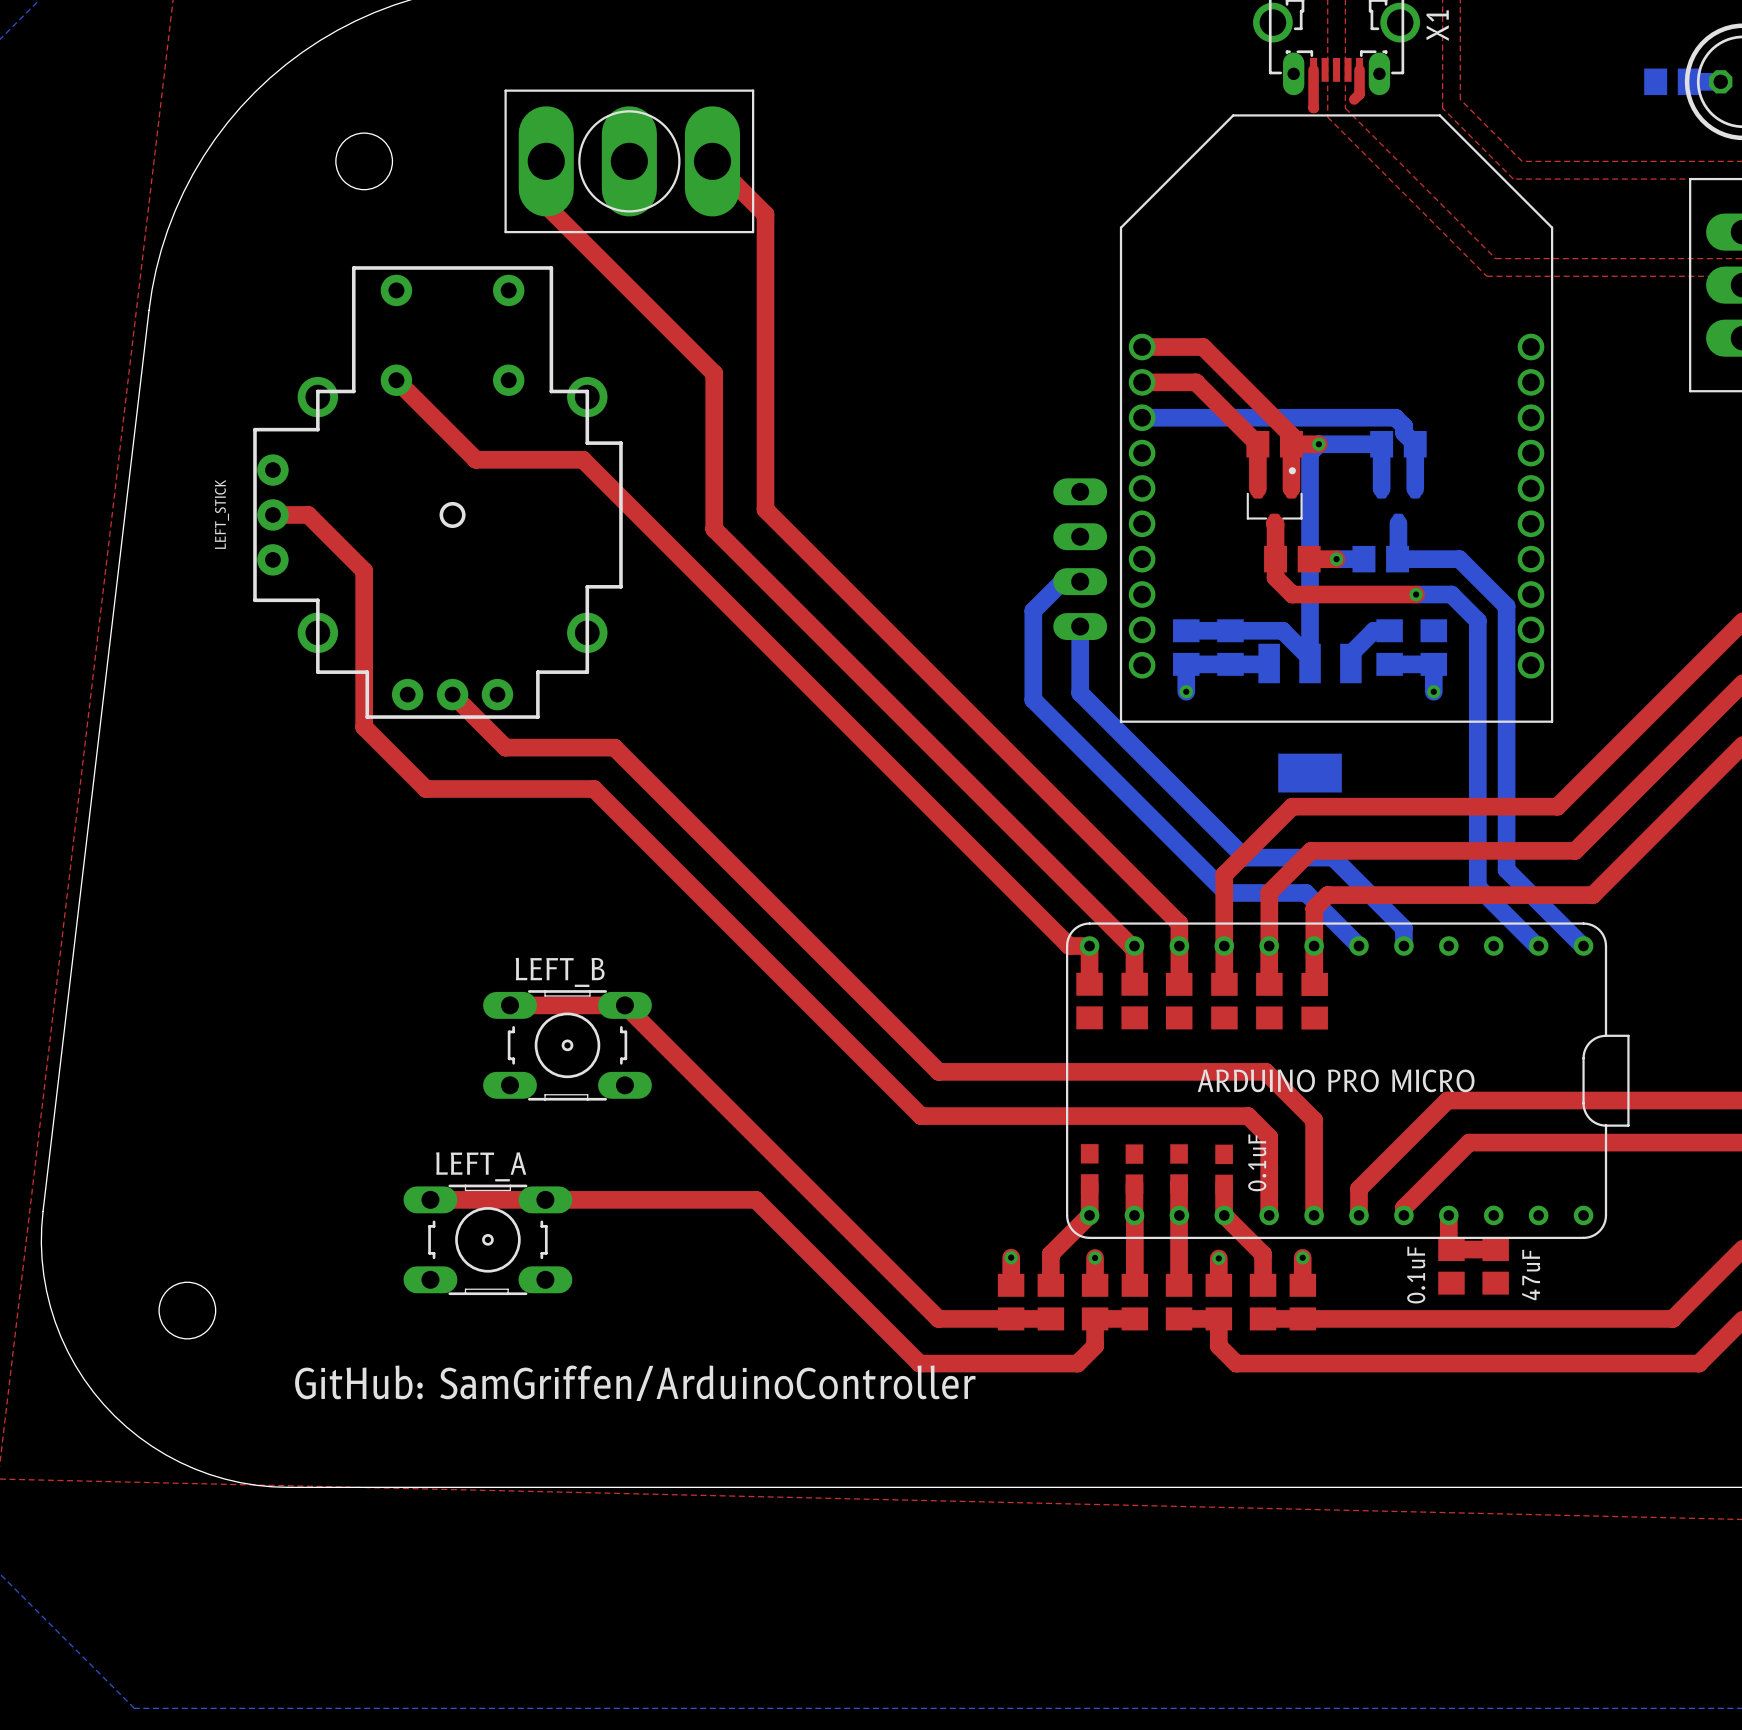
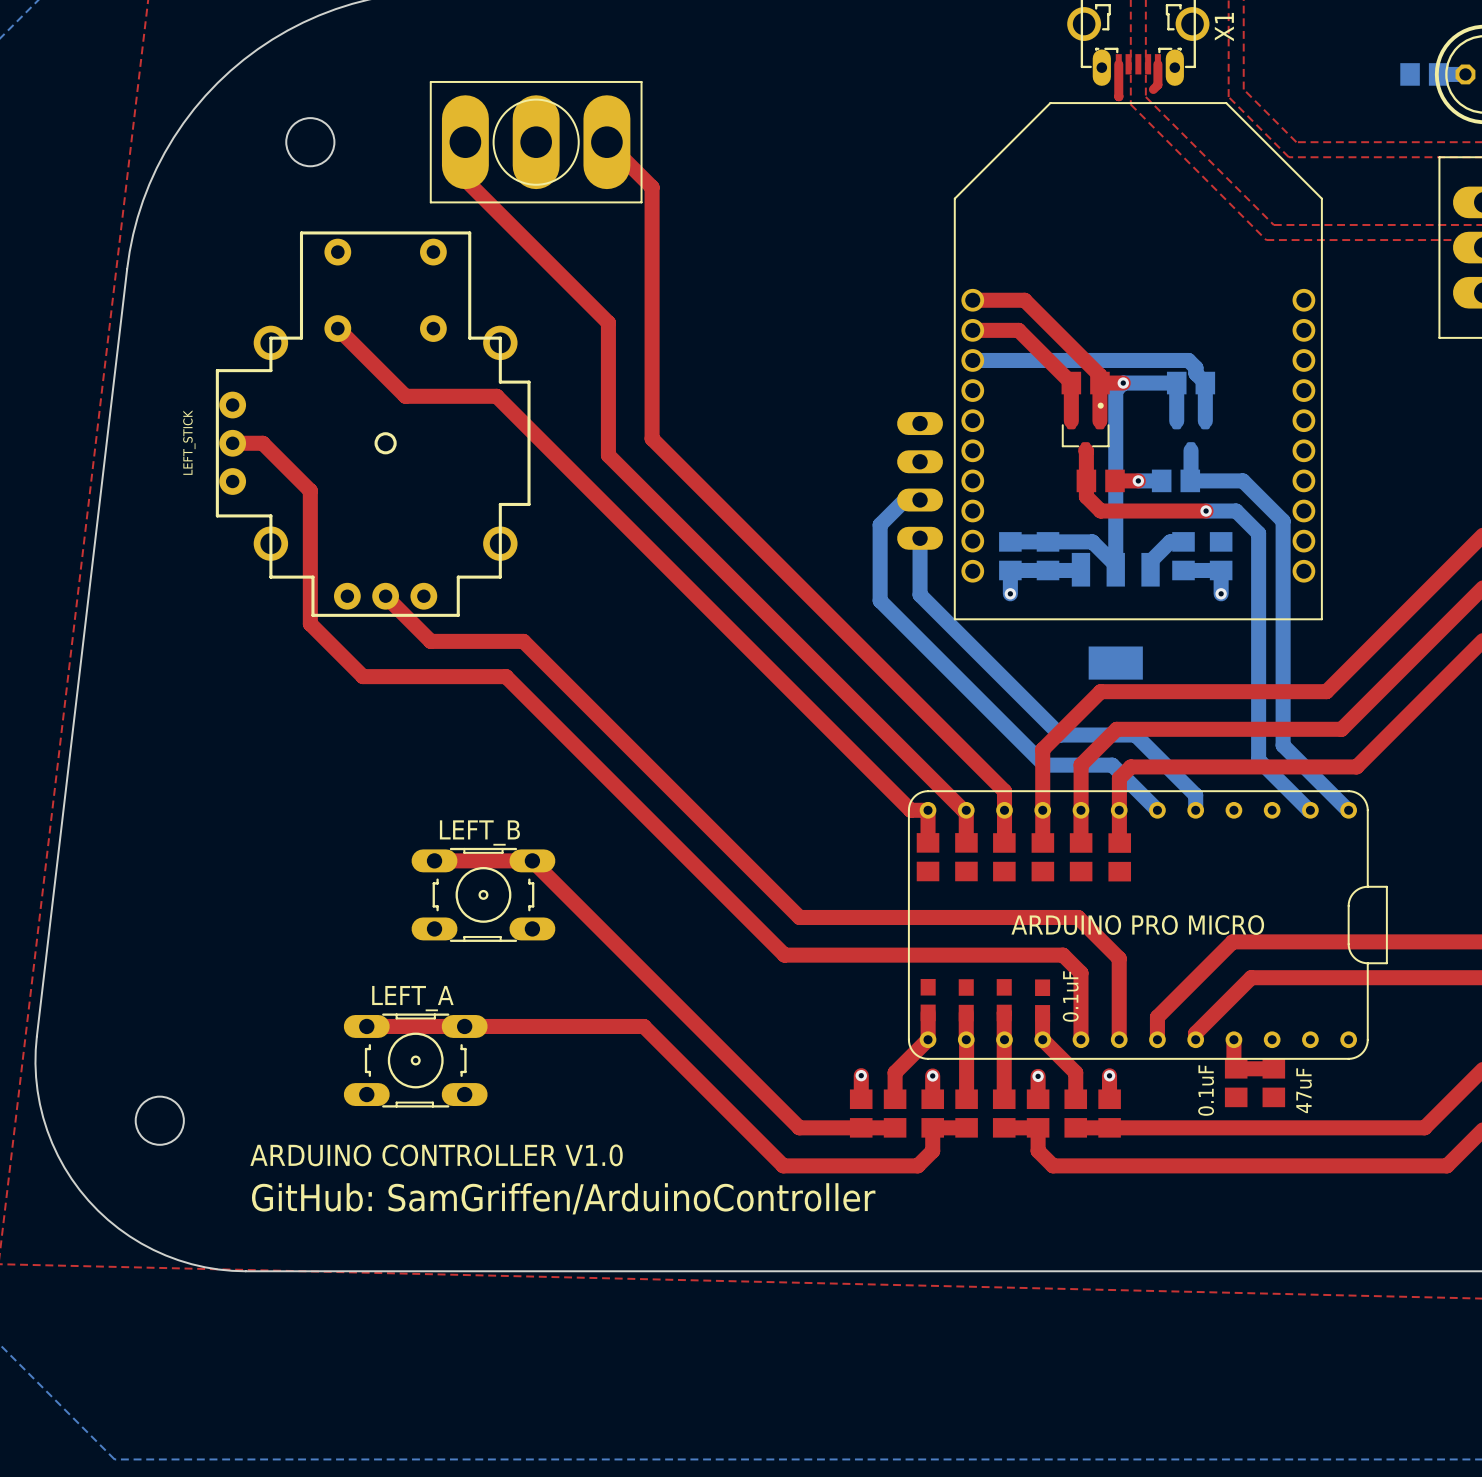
text: none -> ARDUINO CONTROLLER V1.0 (436, 1155)
text position: GitHub: SamGriffen/ArduinoController (635, 1383) -> GitHub: SamGriffen/ArduinoController (563, 1198)

